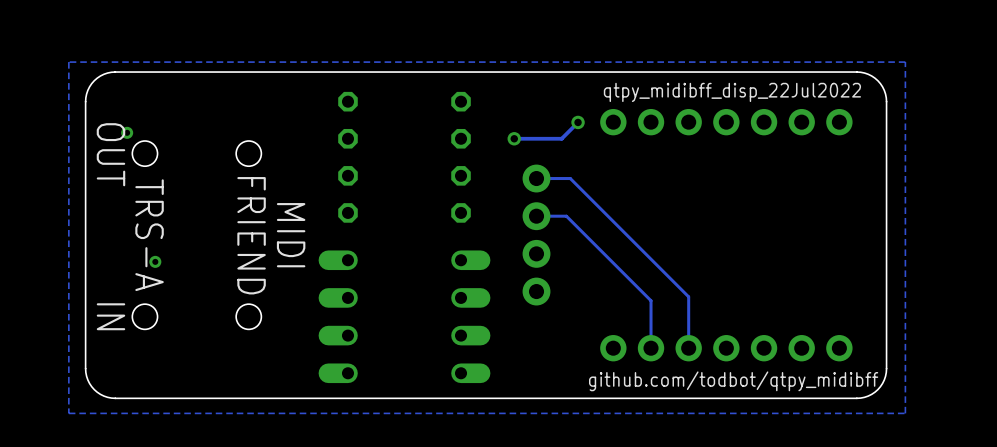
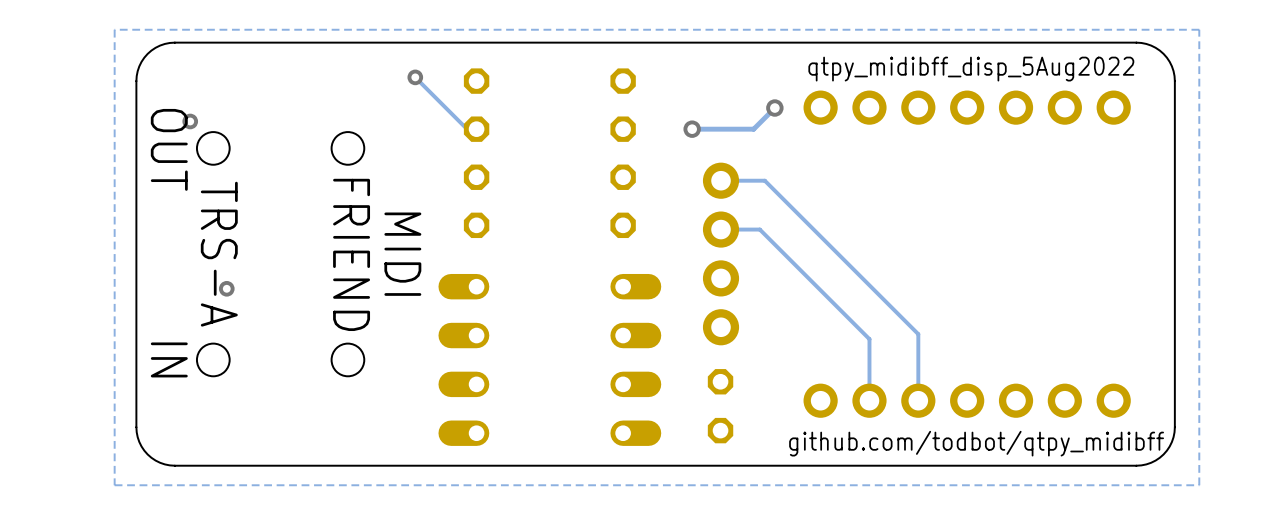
text: qtpy_midibff_disp_22Jul2022 (732, 92) -> qtpy_midibff_disp_5Aug2022 (971, 69)
track: none -> (415, 77) (467, 129) (476, 129)
via: none -> (415, 77)
part: none -> (720, 406)

